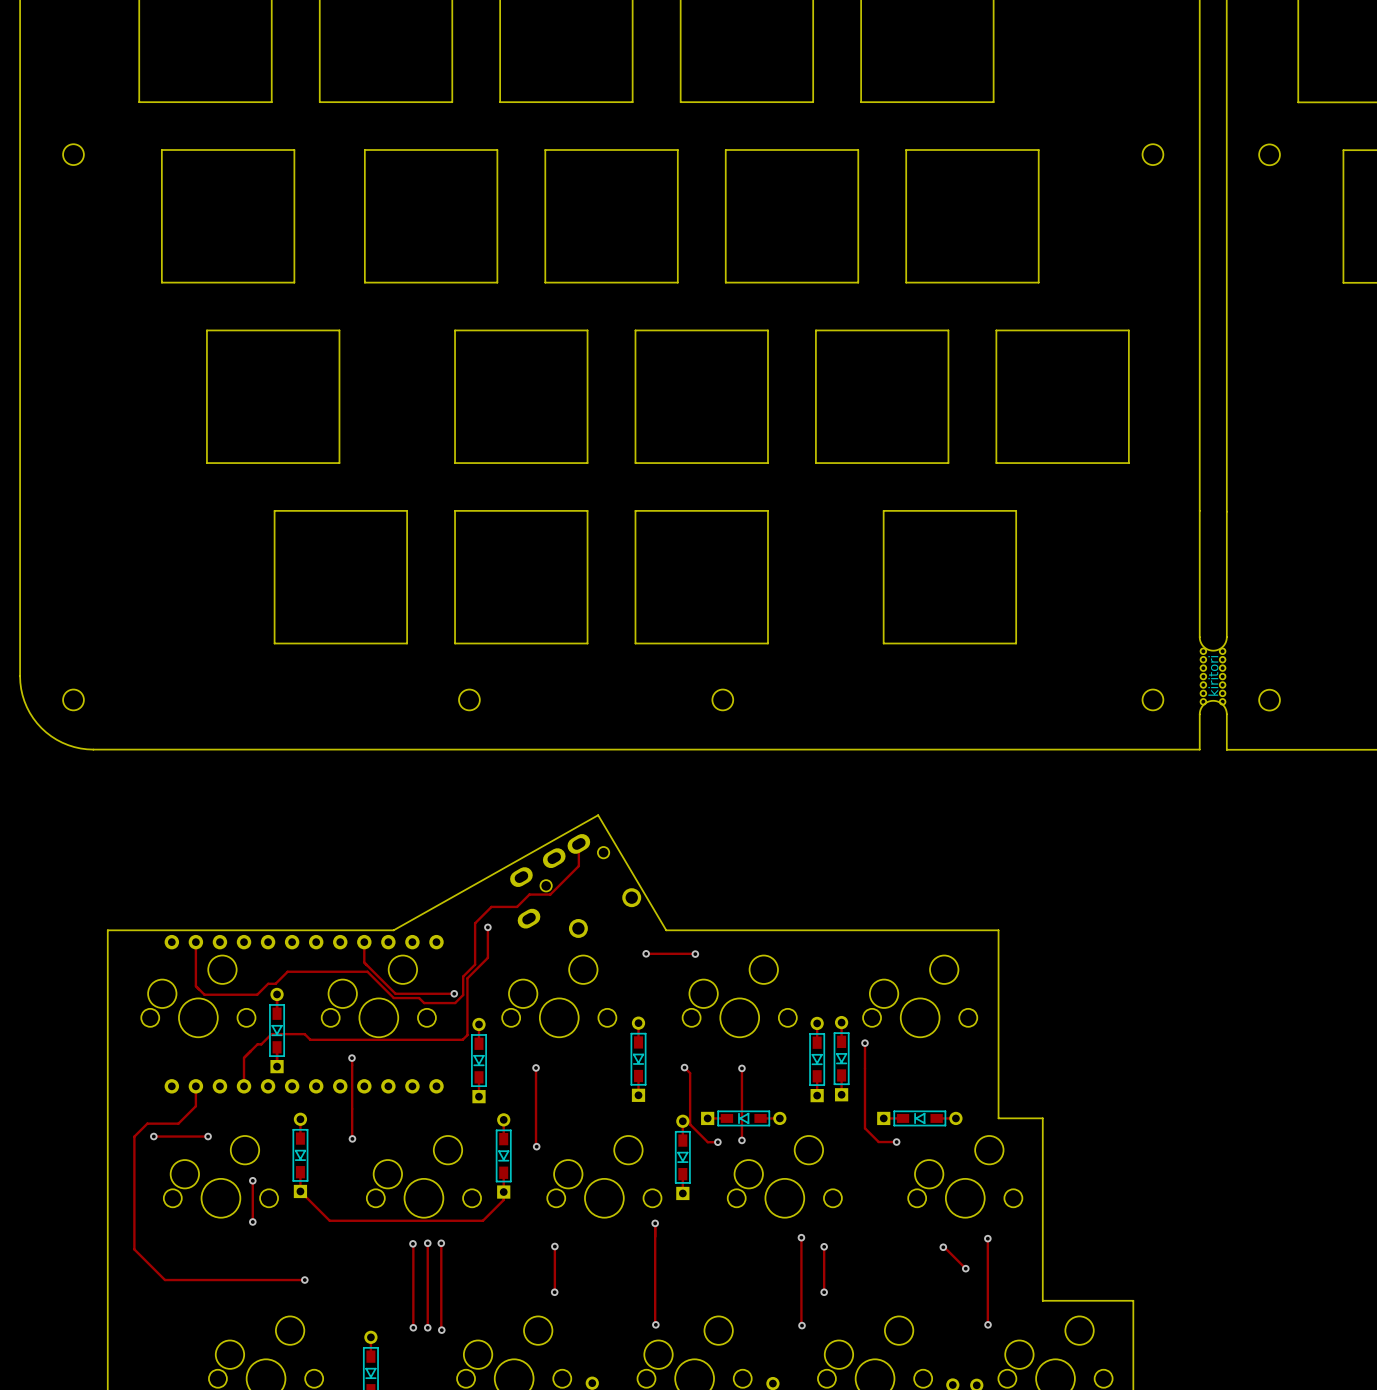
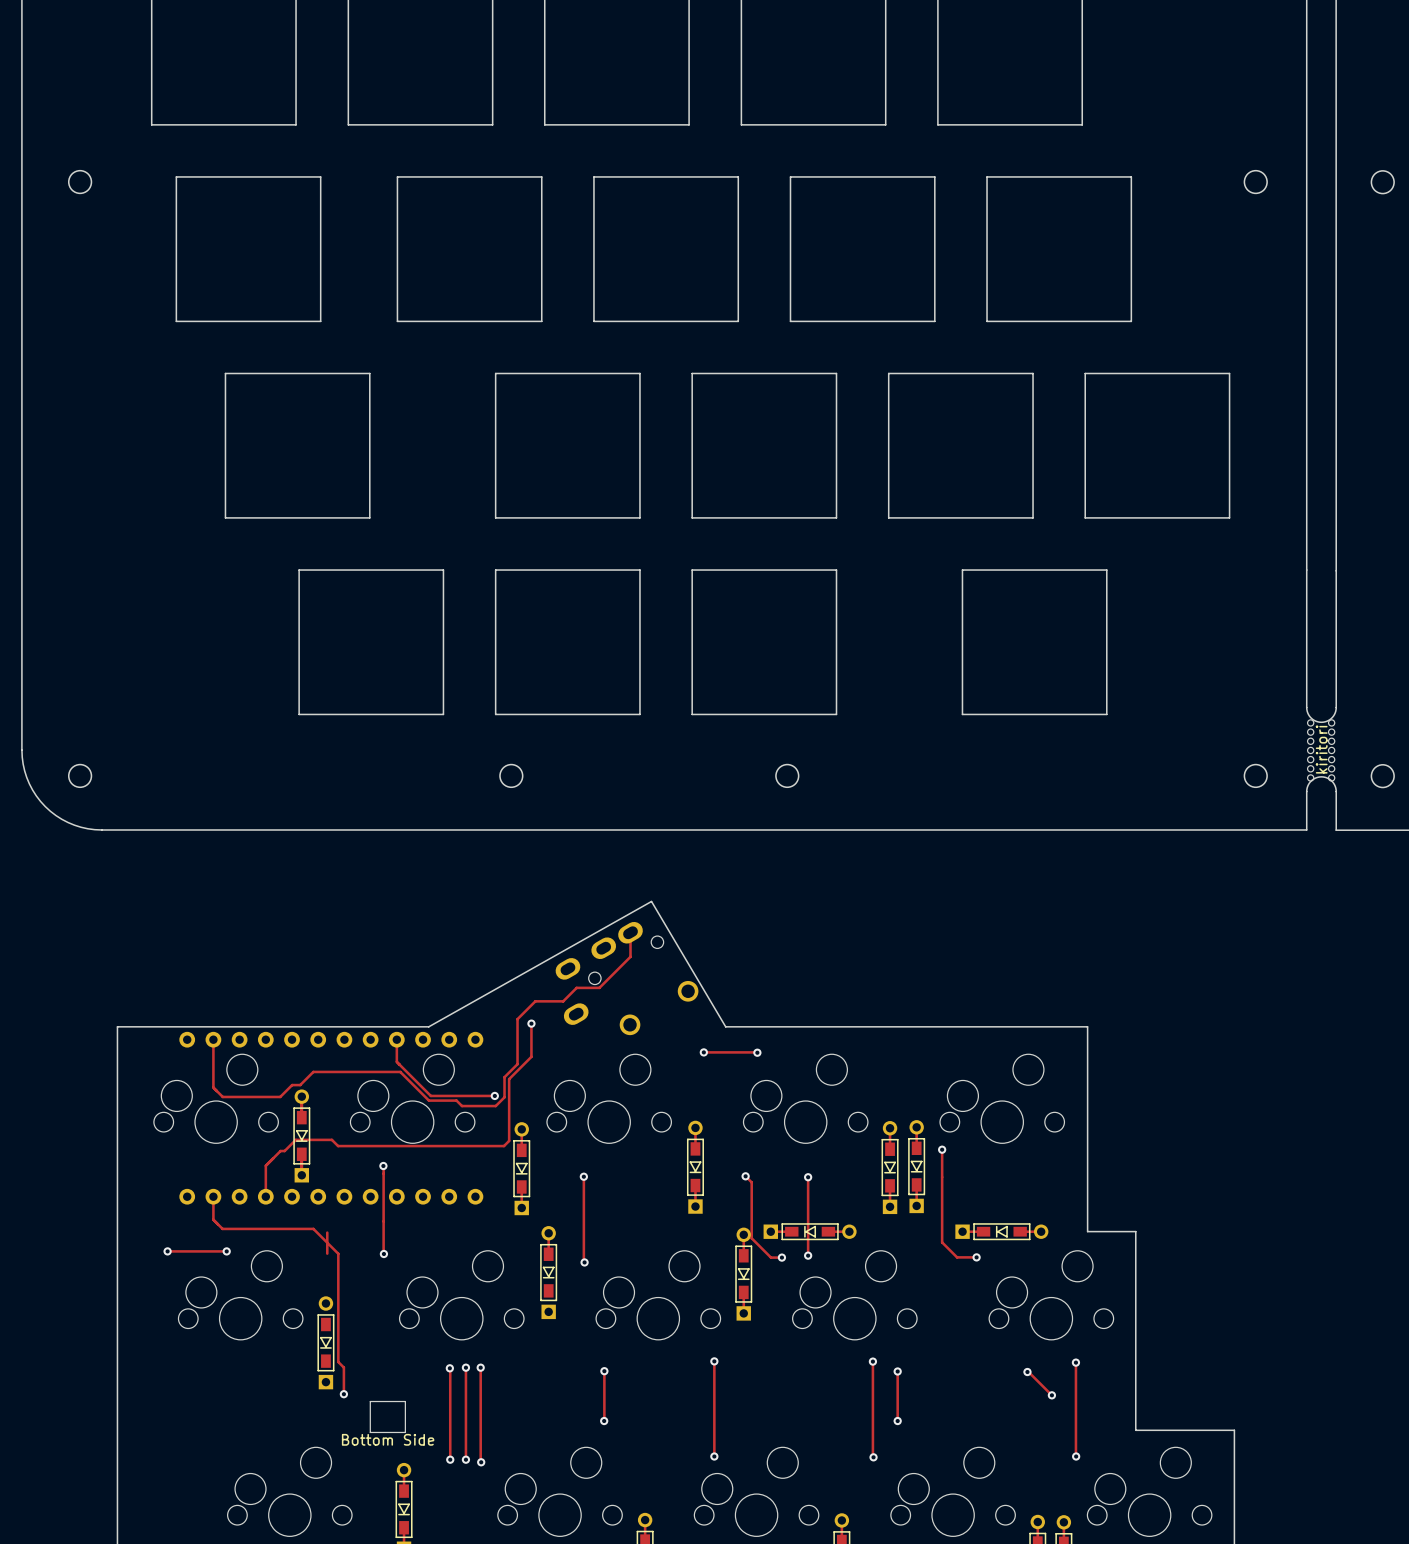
track: (195, 1106) (178, 1123) (147, 1123) (134, 1136) (134, 1249) (164, 1280) (304, 1280) -> (213, 1218) (222, 1228) (313, 1228) (338, 1253) (338, 1362) (343, 1367) (343, 1394)
part position: (300, 1155) -> (325, 1342)
track: (300, 1172) (300, 1191) (329, 1220) (482, 1220) (503, 1199) (503, 1172) -> none
track: (252, 1180) (252, 1221) -> none
via: (252, 1180) -> none
via: (252, 1221) -> none
track: (655, 1223) (655, 1324) -> (714, 1361) (714, 1456)
via position: (655, 1223) -> (714, 1361)
via position: (304, 1280) -> (343, 1394)
part: none -> (387, 1416)

